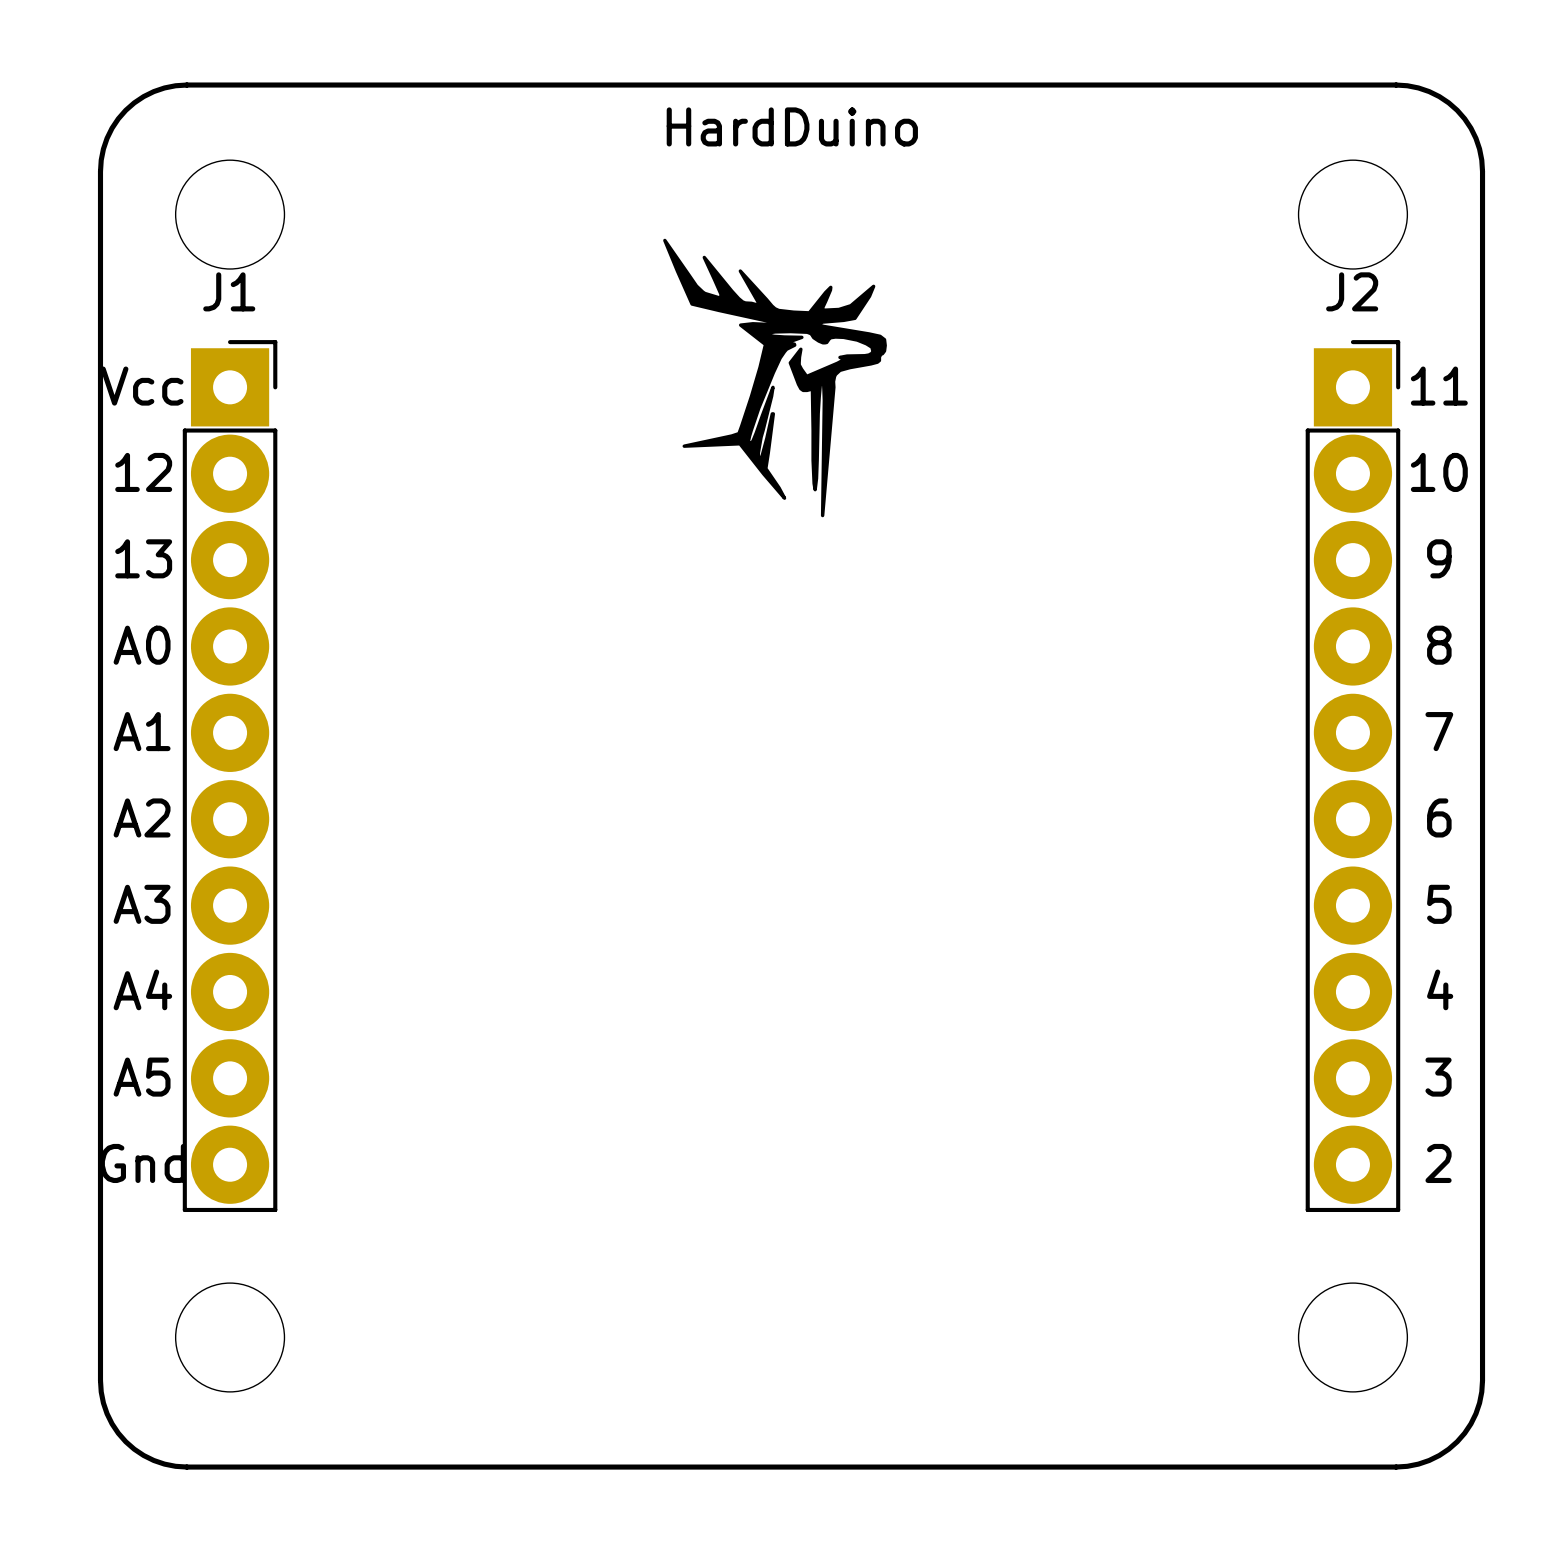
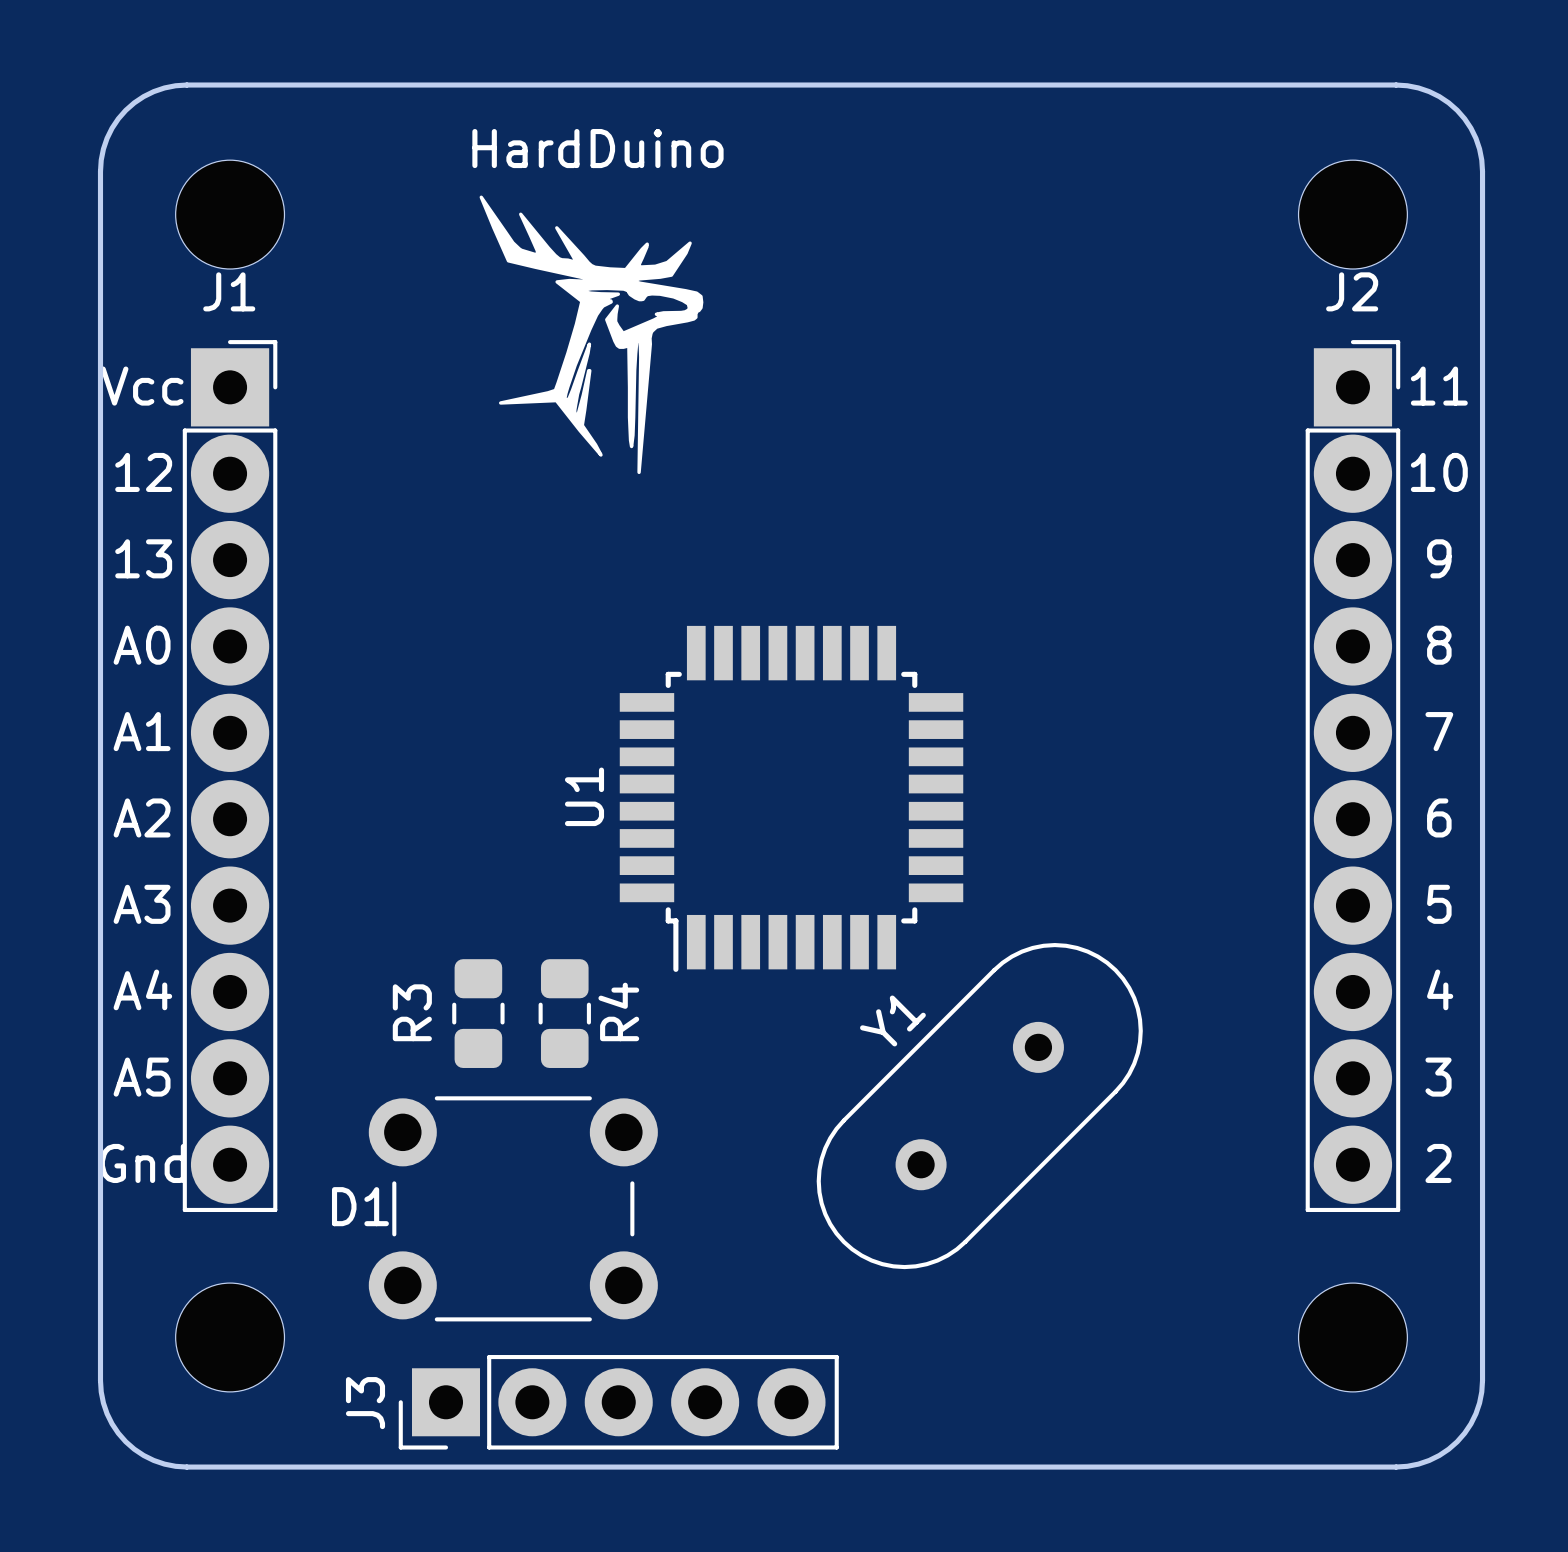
text position: HardDuino (792, 126) -> HardDuino (597, 148)
drawing position: (775, 377) -> (591, 334)
U1: none -> (791, 798)
R3: none -> (478, 1013)
R4: none -> (564, 1013)
Y1: none -> (979, 1106)
D1: none -> (513, 1208)
J3: none -> (618, 1402)

